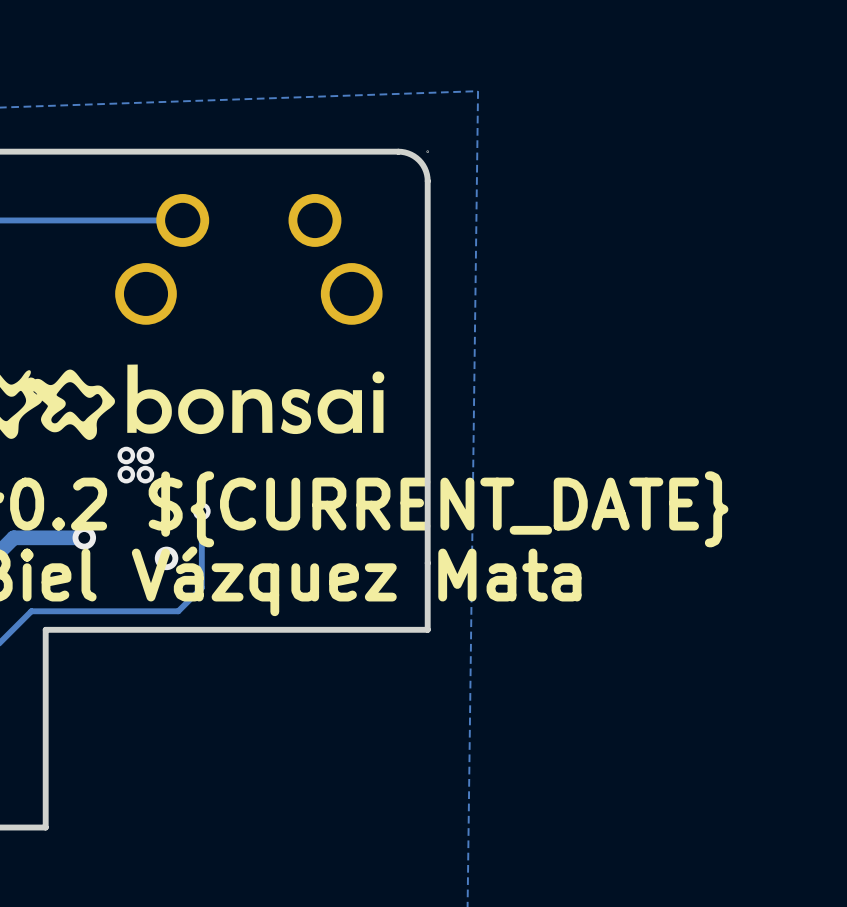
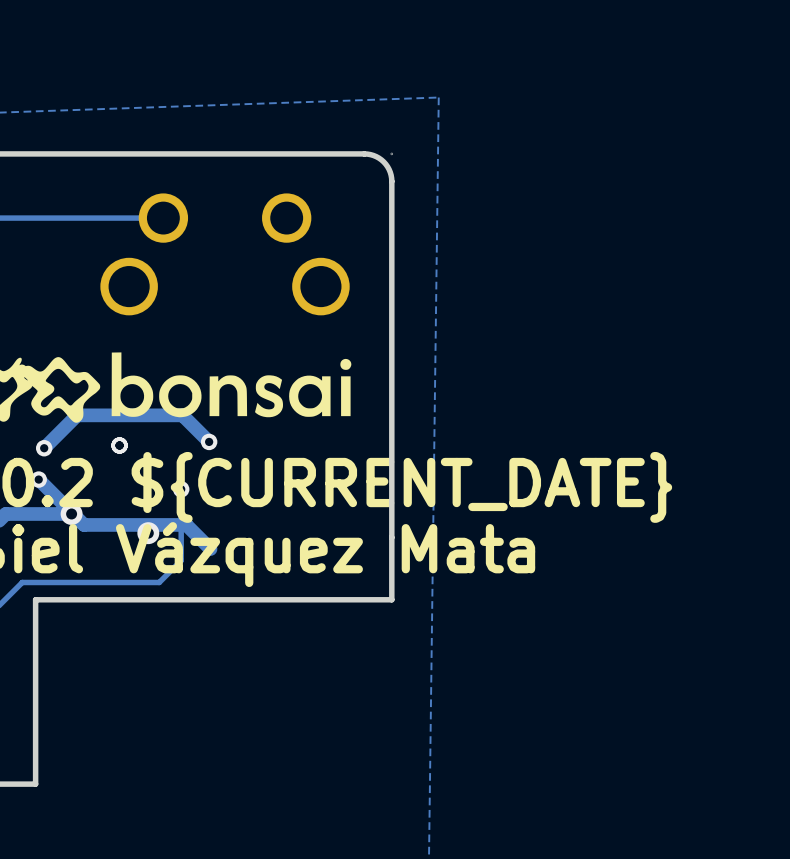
via: (126, 455) -> none
via: (145, 455) -> none
track: none -> (209, 441) (182, 415) (77, 415) (44, 448)
via: none -> (209, 441)
via: none -> (119, 445)
via: none -> (44, 448)
via: (126, 474) -> none
via: (145, 474) -> none
track: none -> (38, 479) (84, 524) (186, 524) (210, 549)
via: none -> (38, 479)

